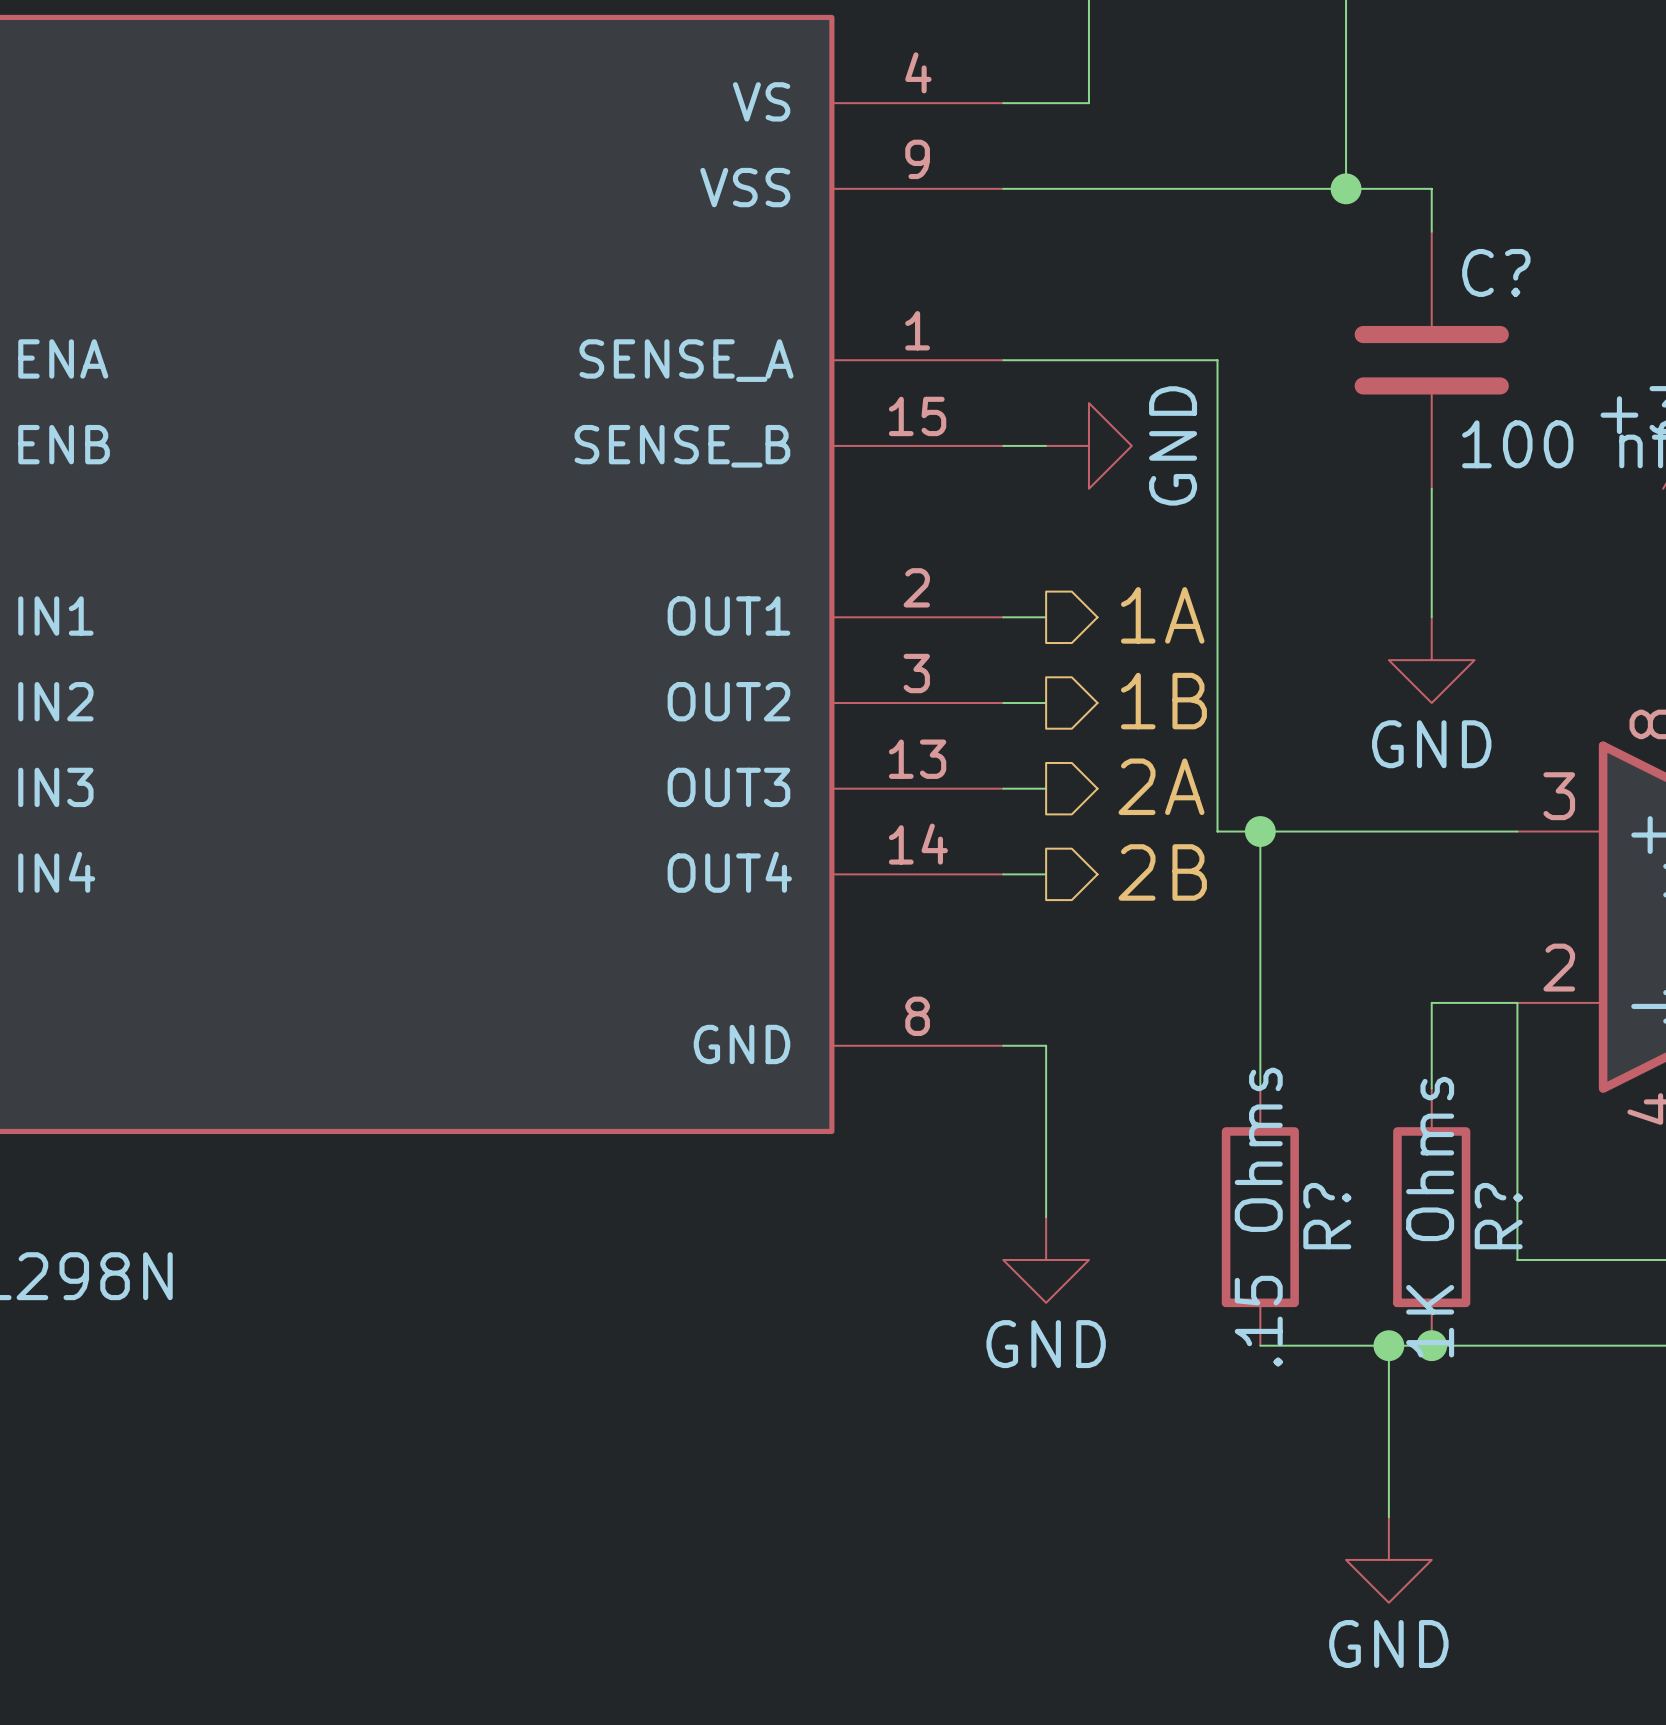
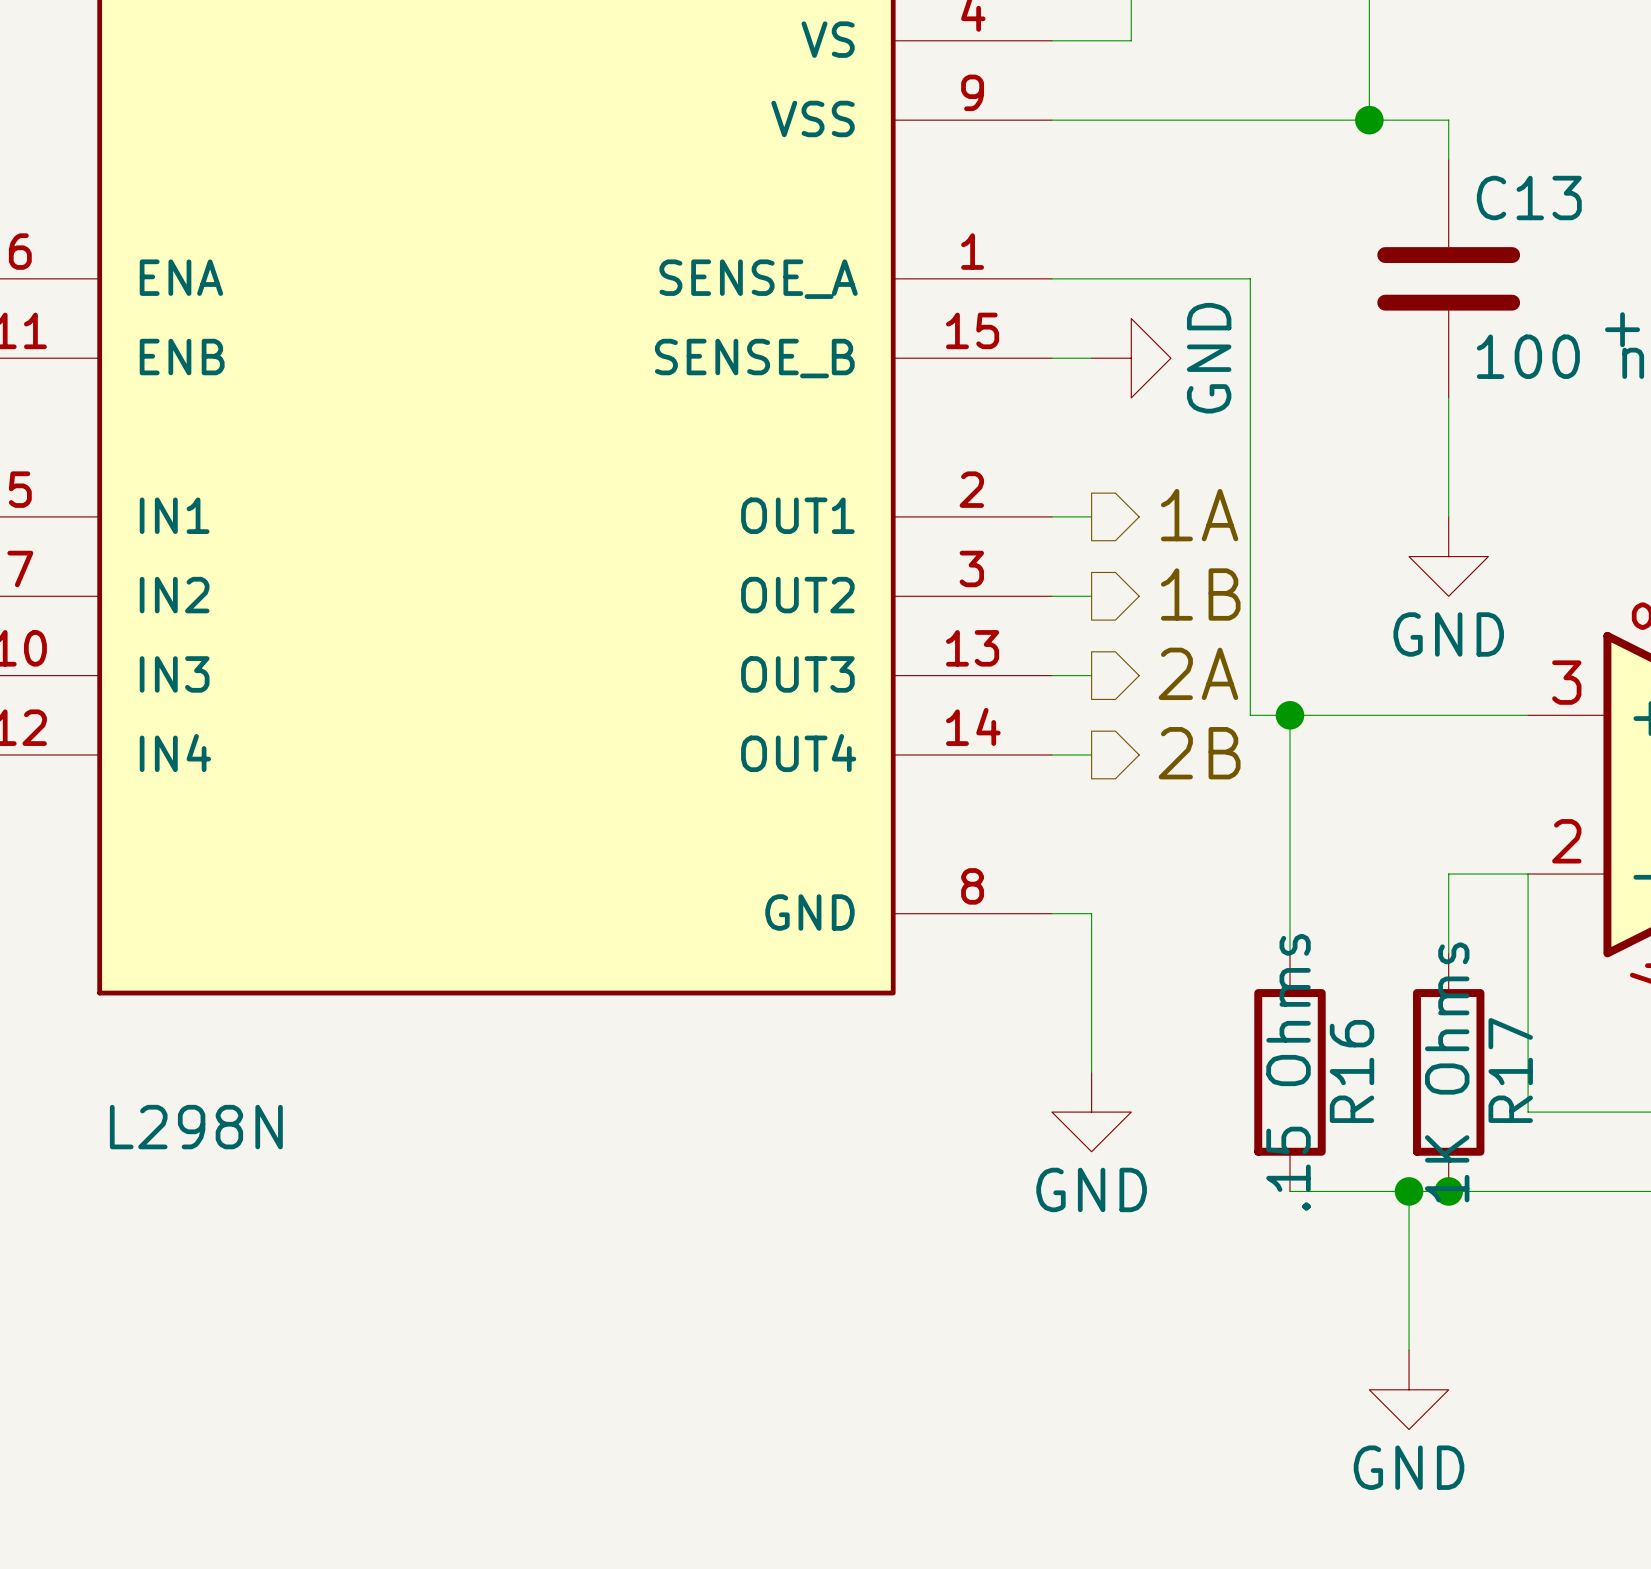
C? name: C? (1496, 272) -> C13 (1529, 198)
R? name: R? (1327, 1216) -> R16 (1351, 1071)
R? name: R? (1498, 1216) -> R17 (1510, 1070)

